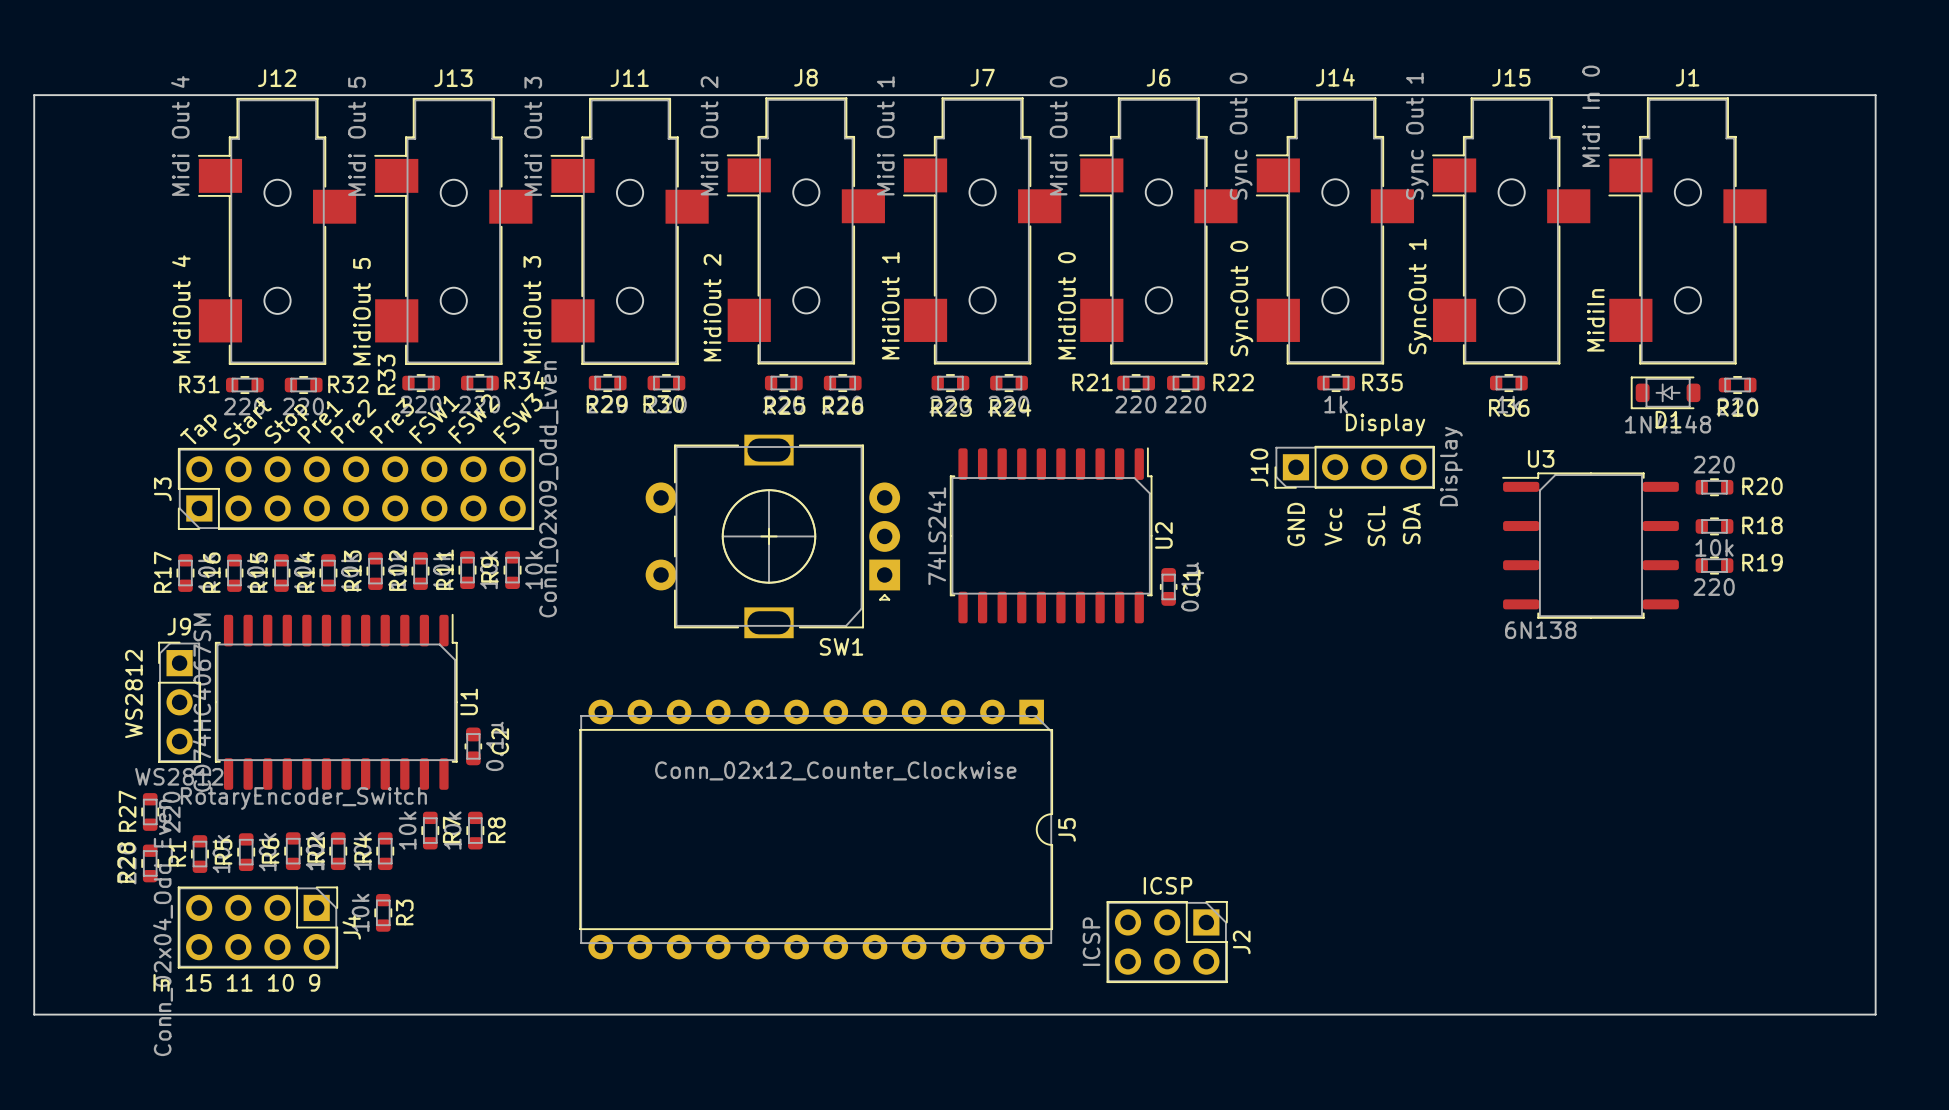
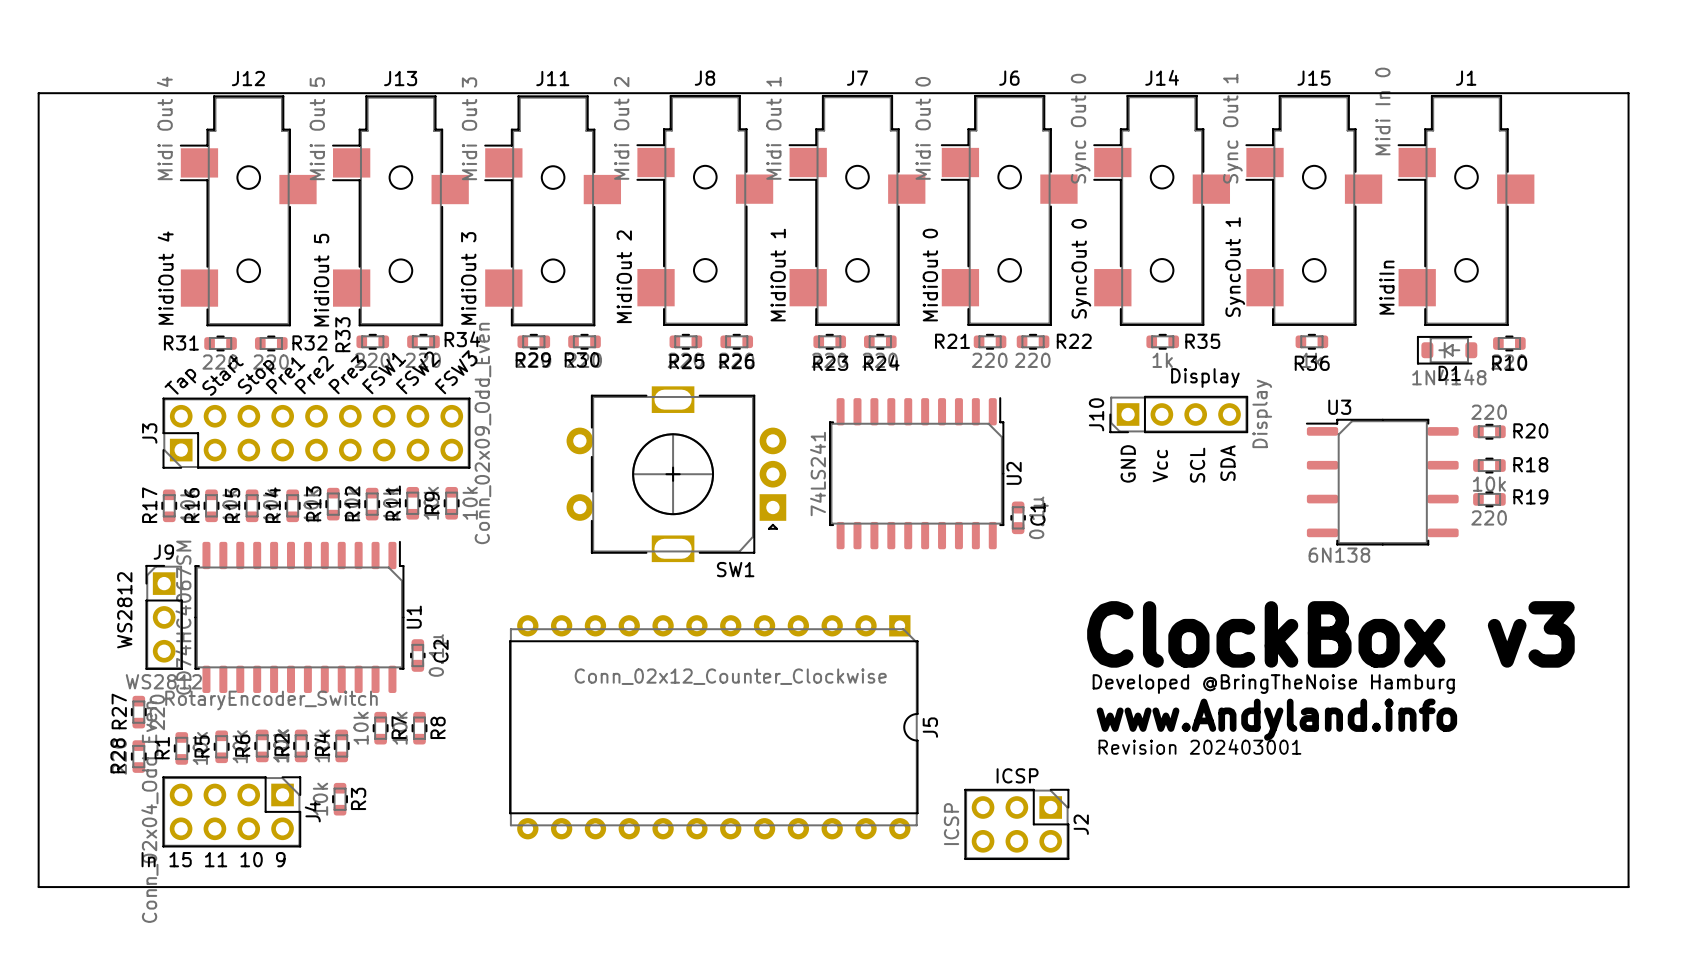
text: none -> ClockBox v3 (1330, 634)
text: none -> Developed @BringTheNoise Hamburg (1273, 684)
text: none -> www.Andyland.info (1276, 719)
text: none -> Revision 202403001 (1199, 746)

